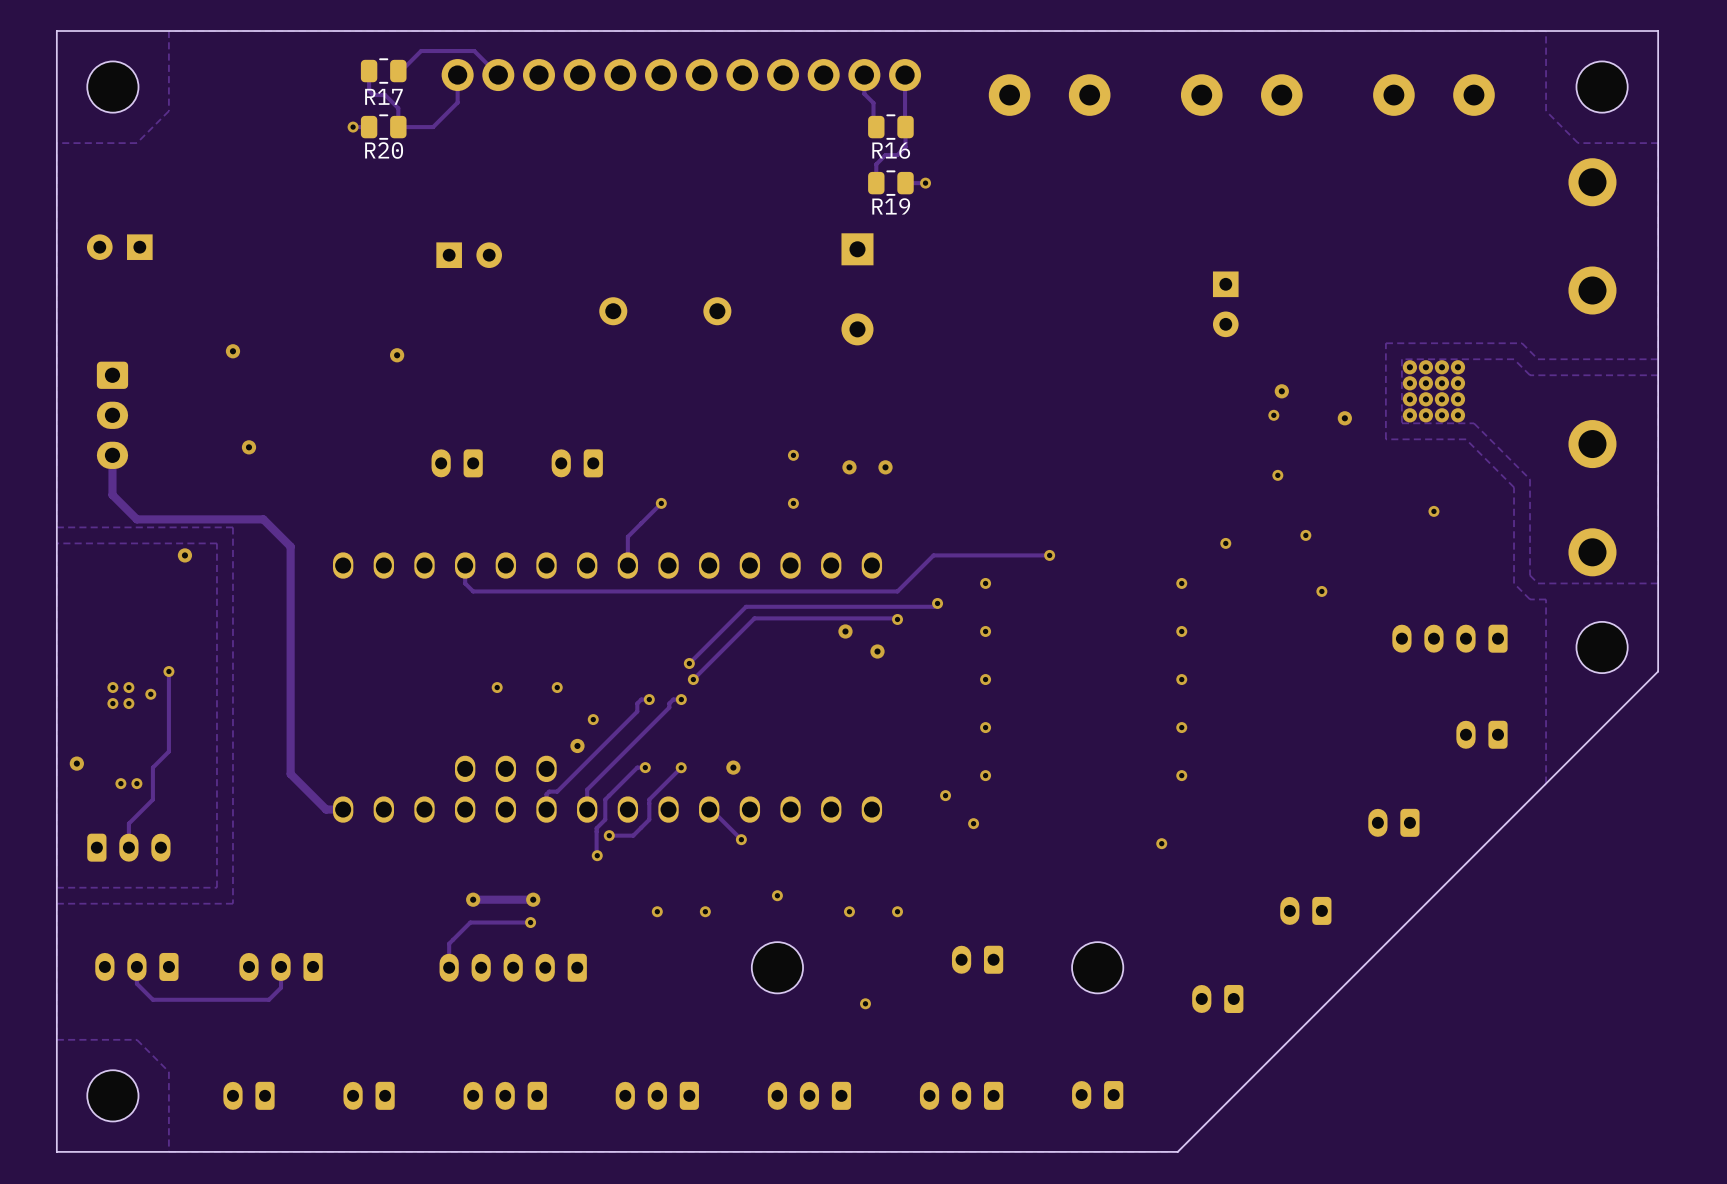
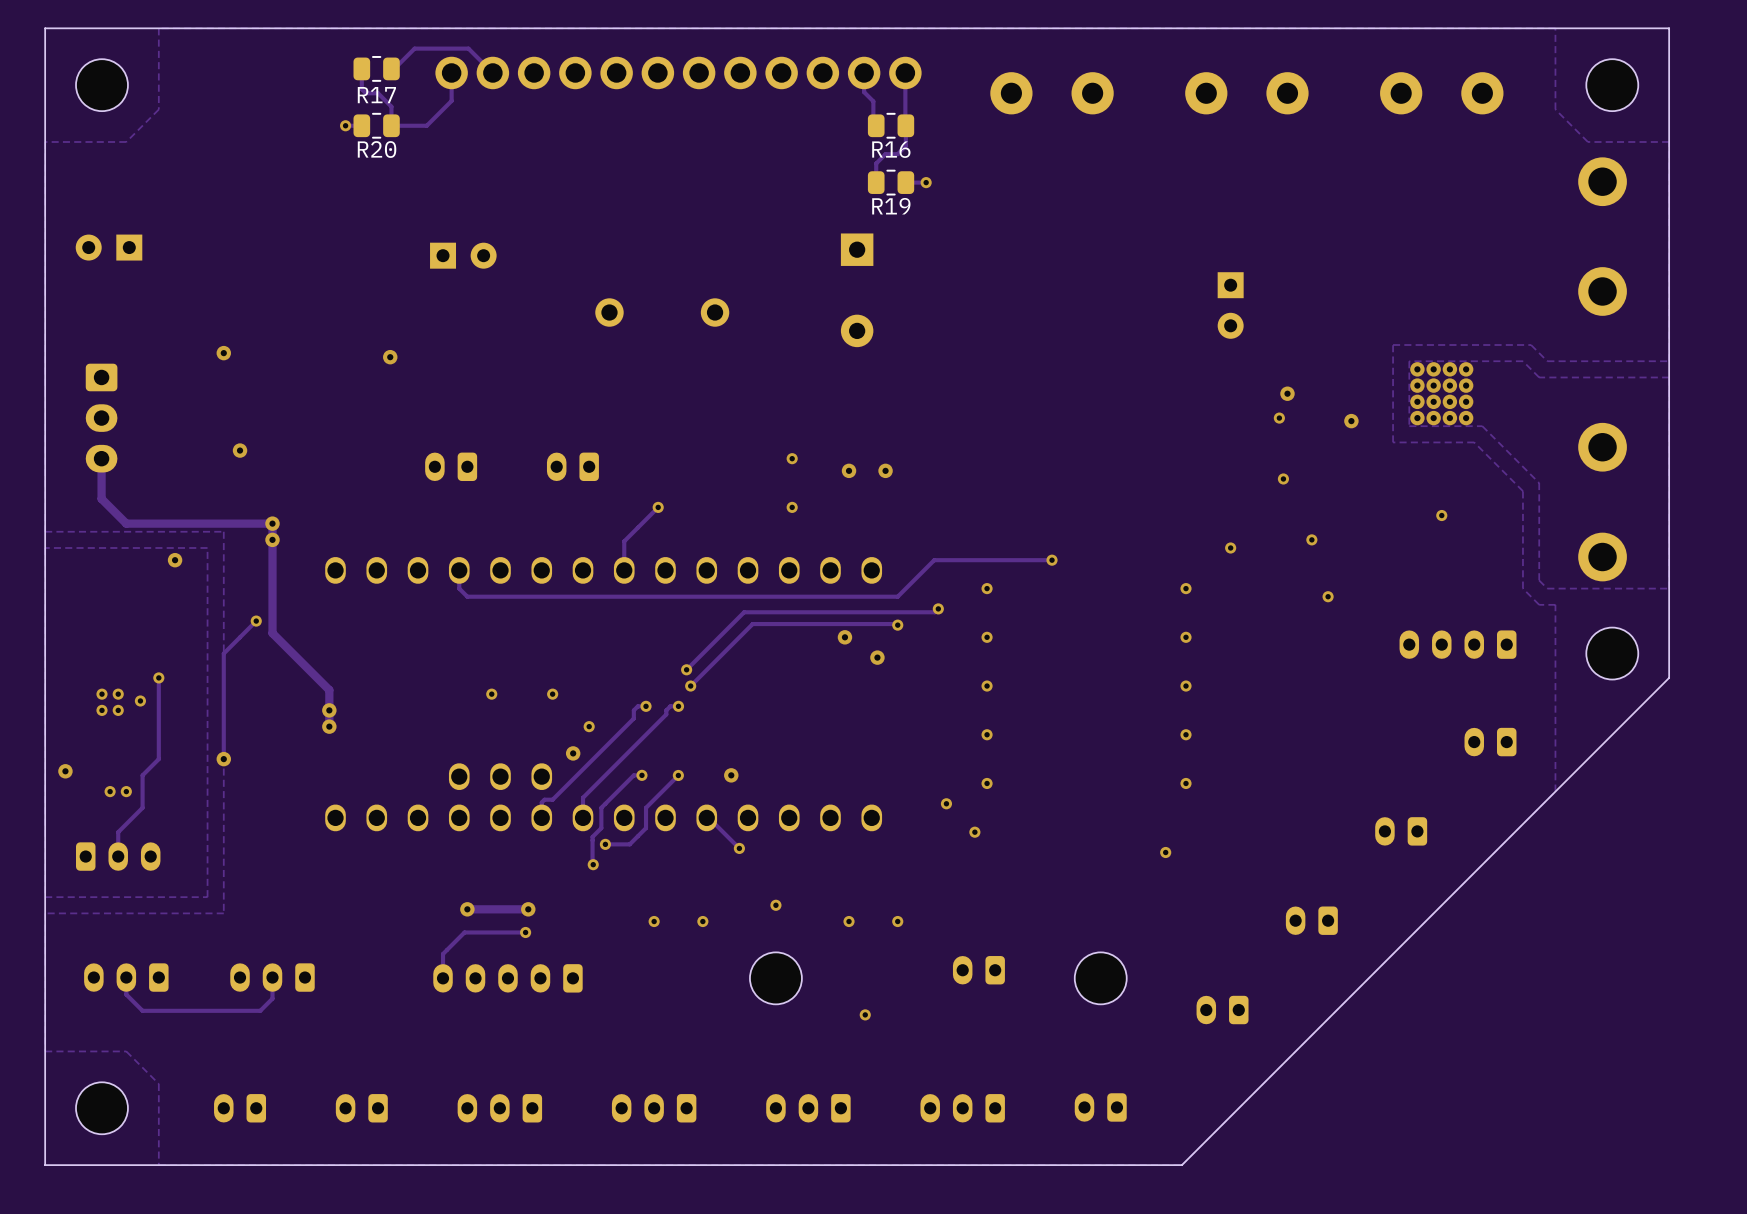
track: (263, 519) (290, 546) (290, 774) (326, 809) (343, 809) -> (254, 523) (272, 523) (272, 633) (329, 690) (329, 726)
via: none -> (272, 523)
via: none -> (272, 539)
track: none -> (256, 621) (223, 653) (223, 759)
via: none -> (256, 621)
via: none -> (329, 710)
via: none -> (329, 726)
via: none -> (223, 759)

